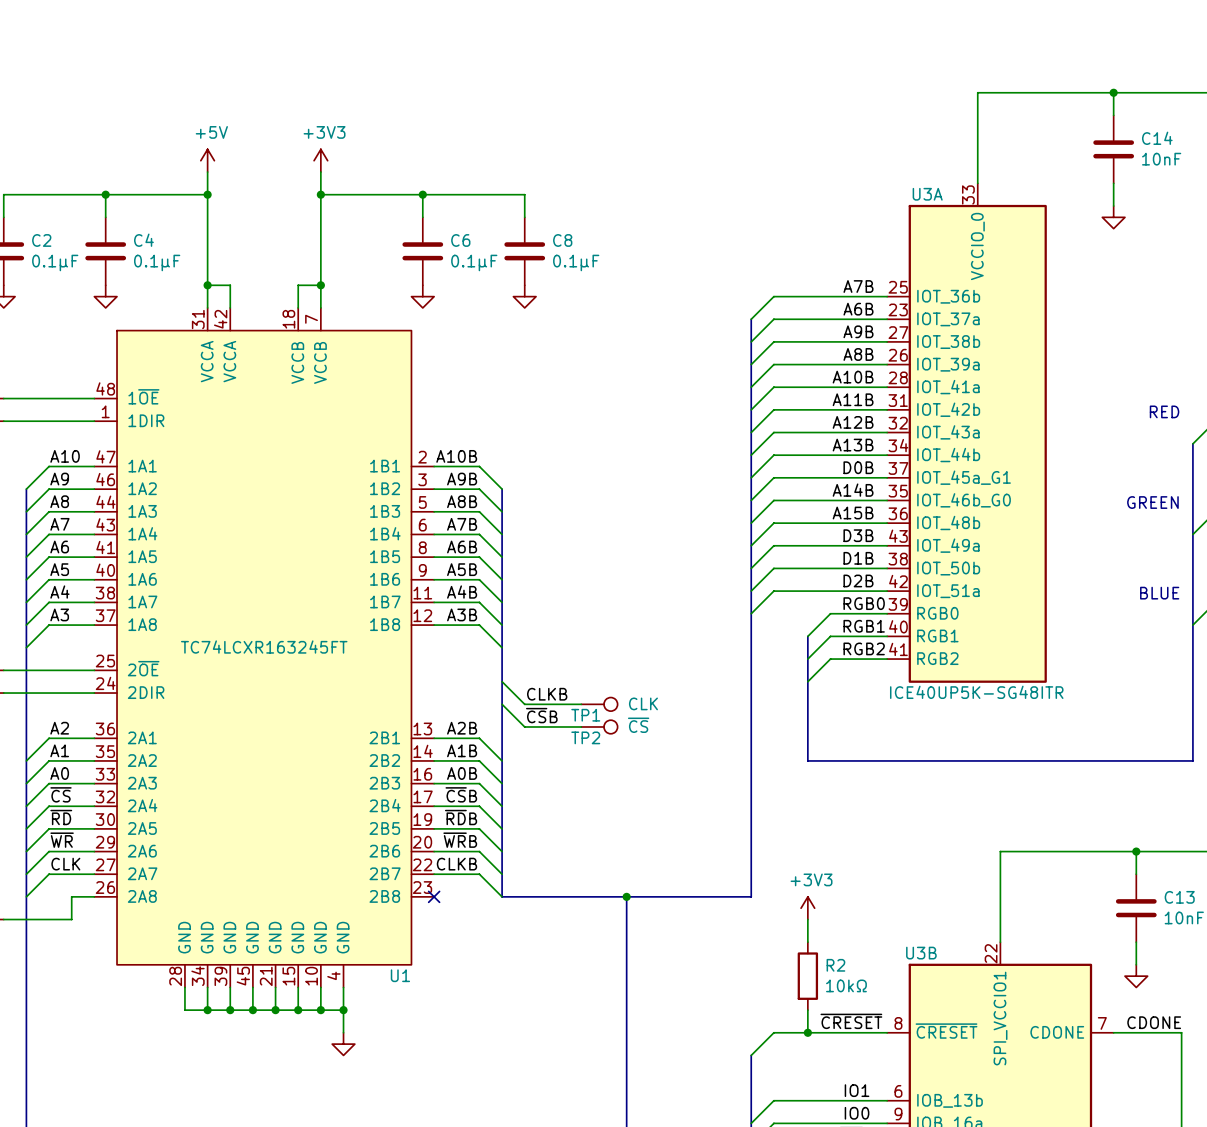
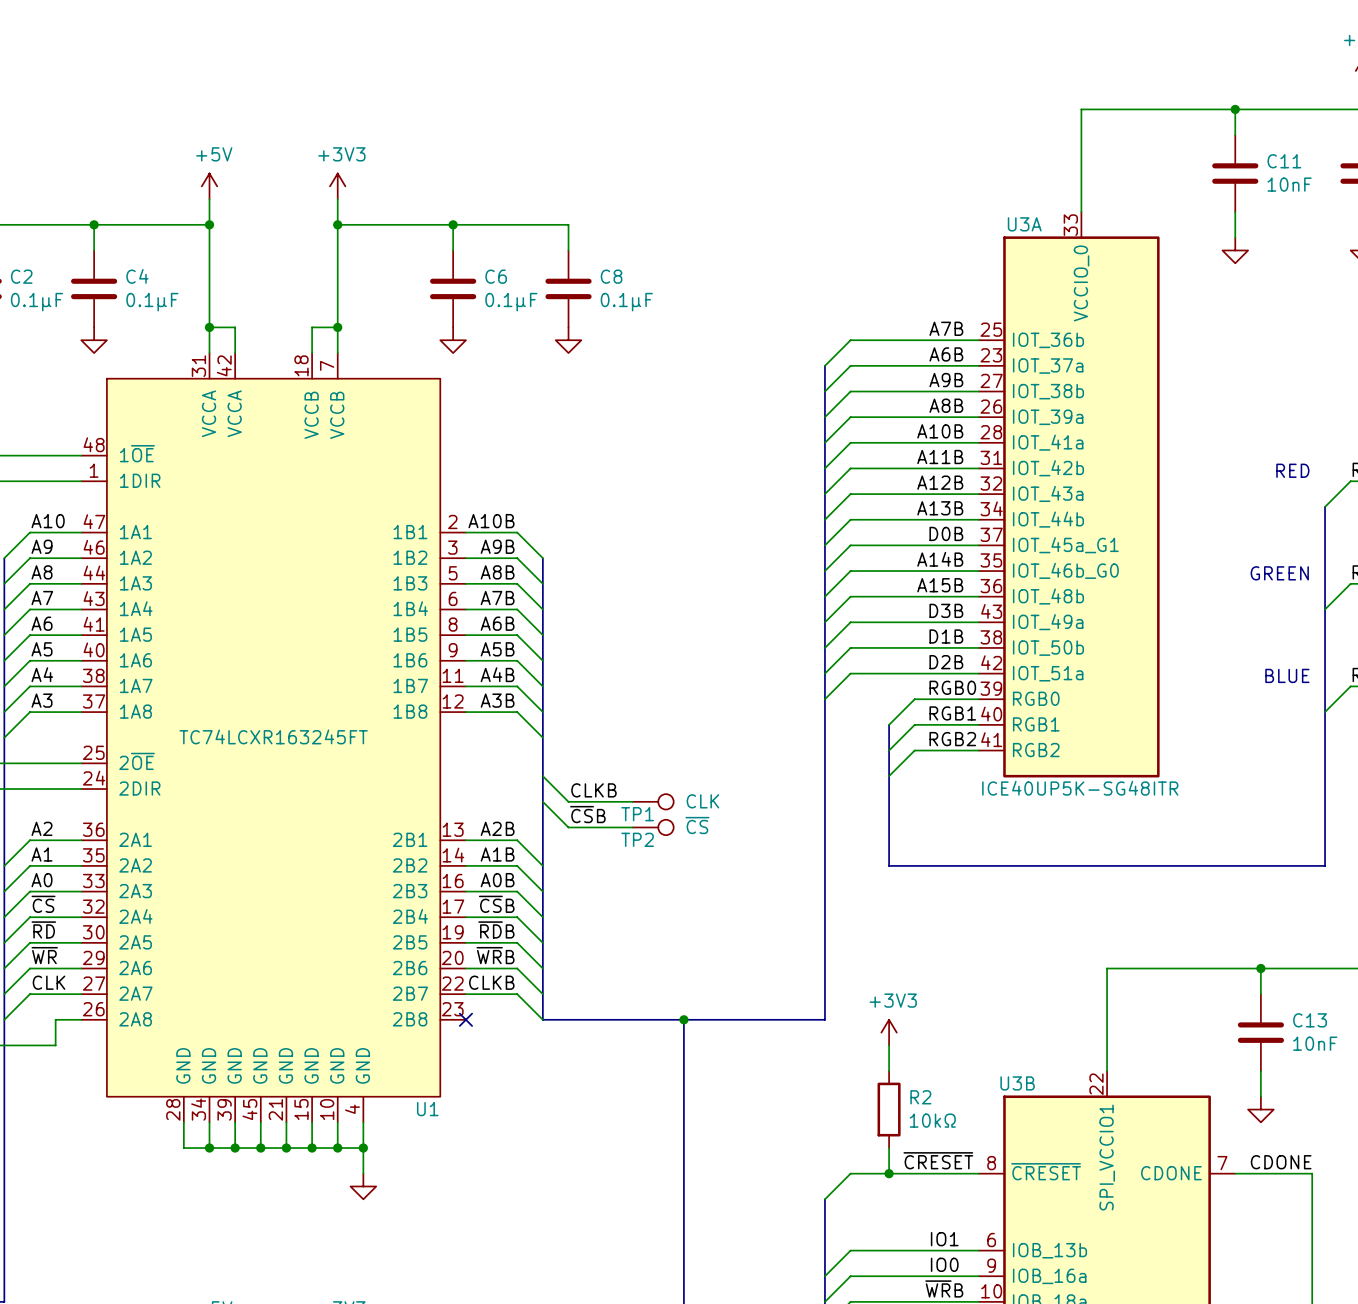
C14 name: C14 (1157, 138) -> C11 (1284, 161)

